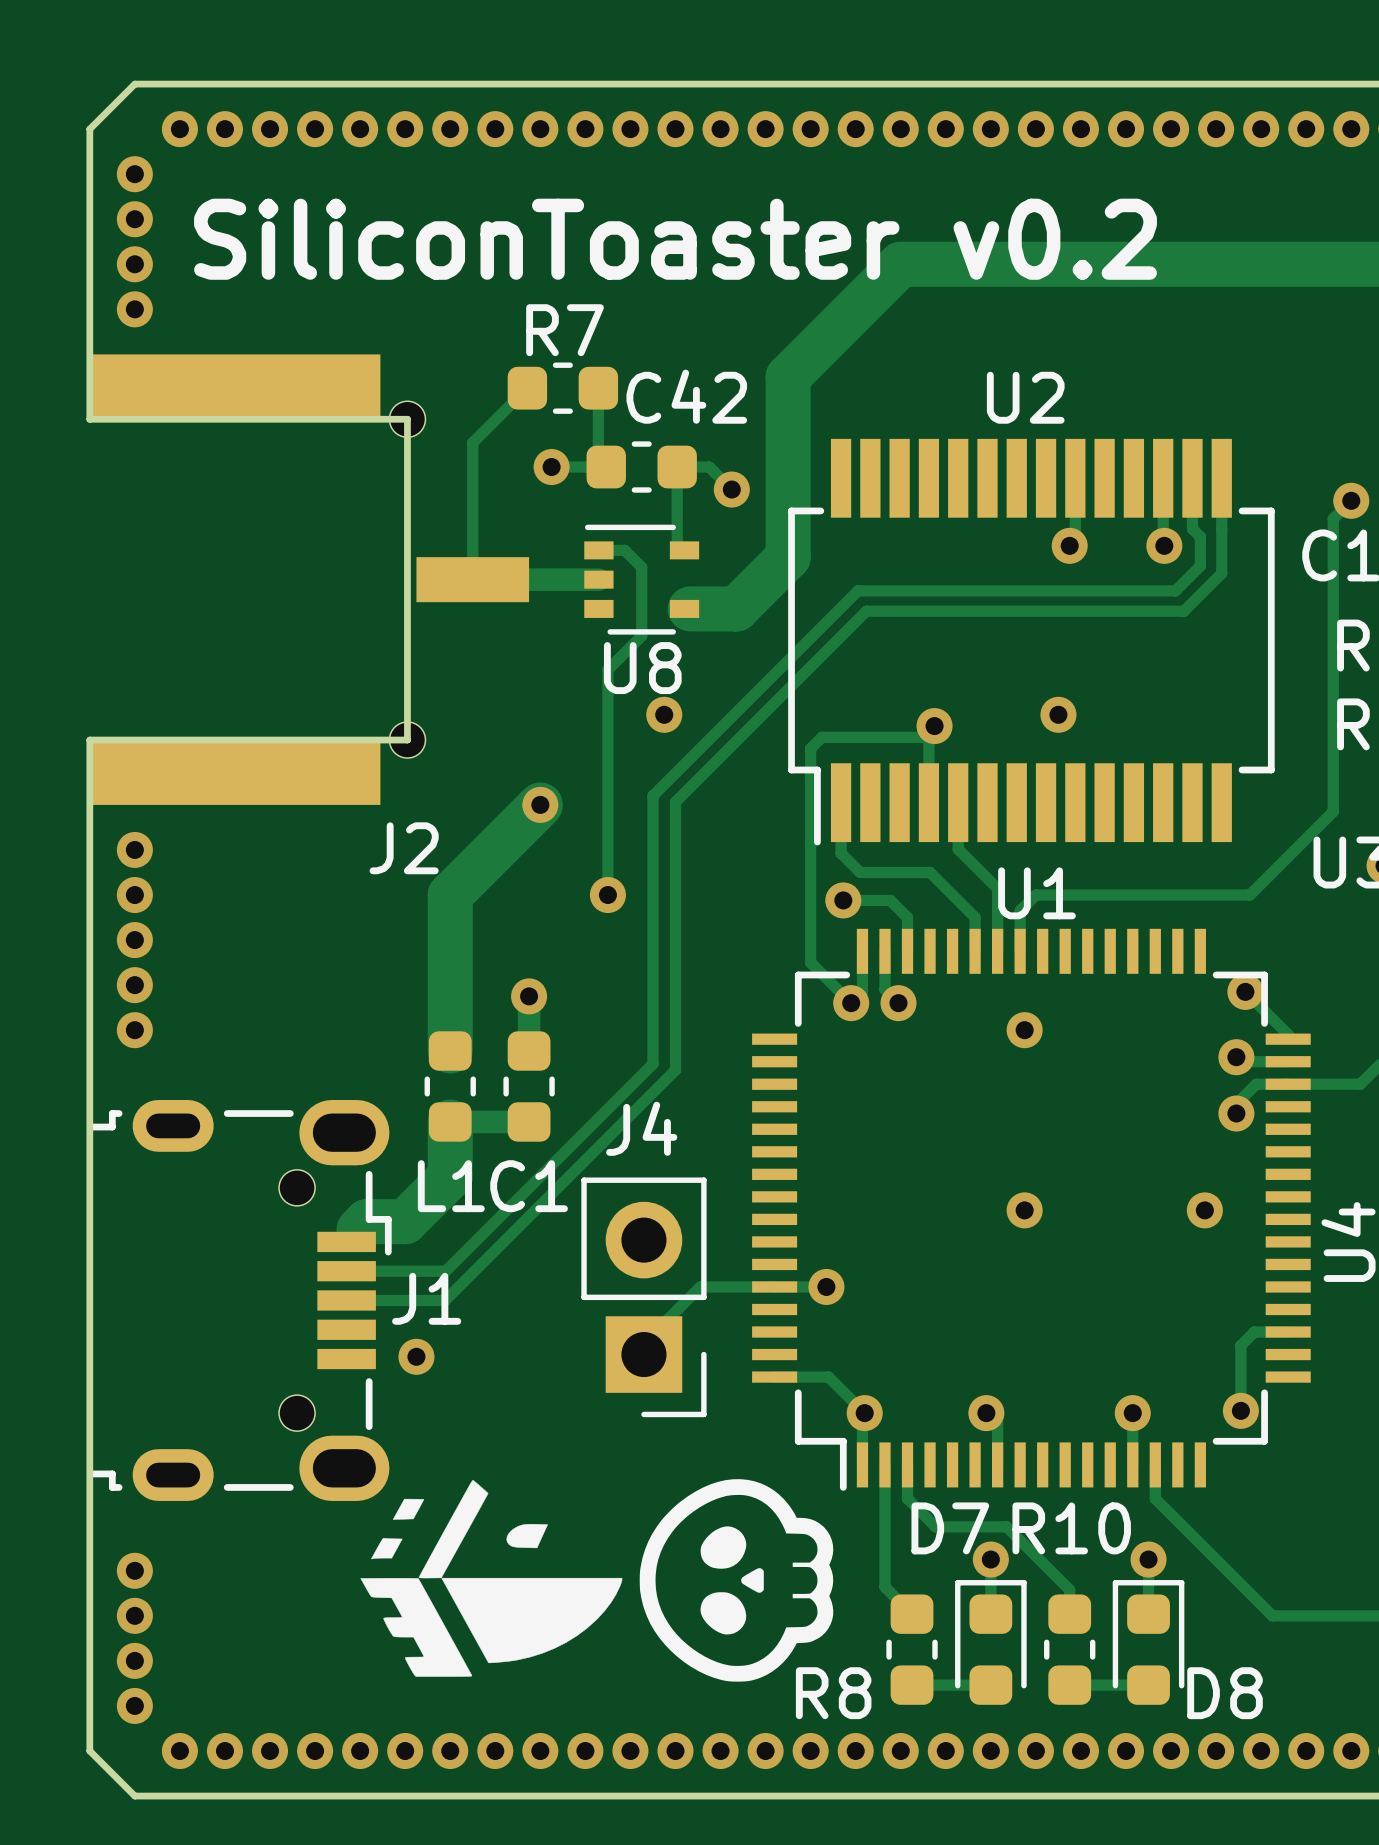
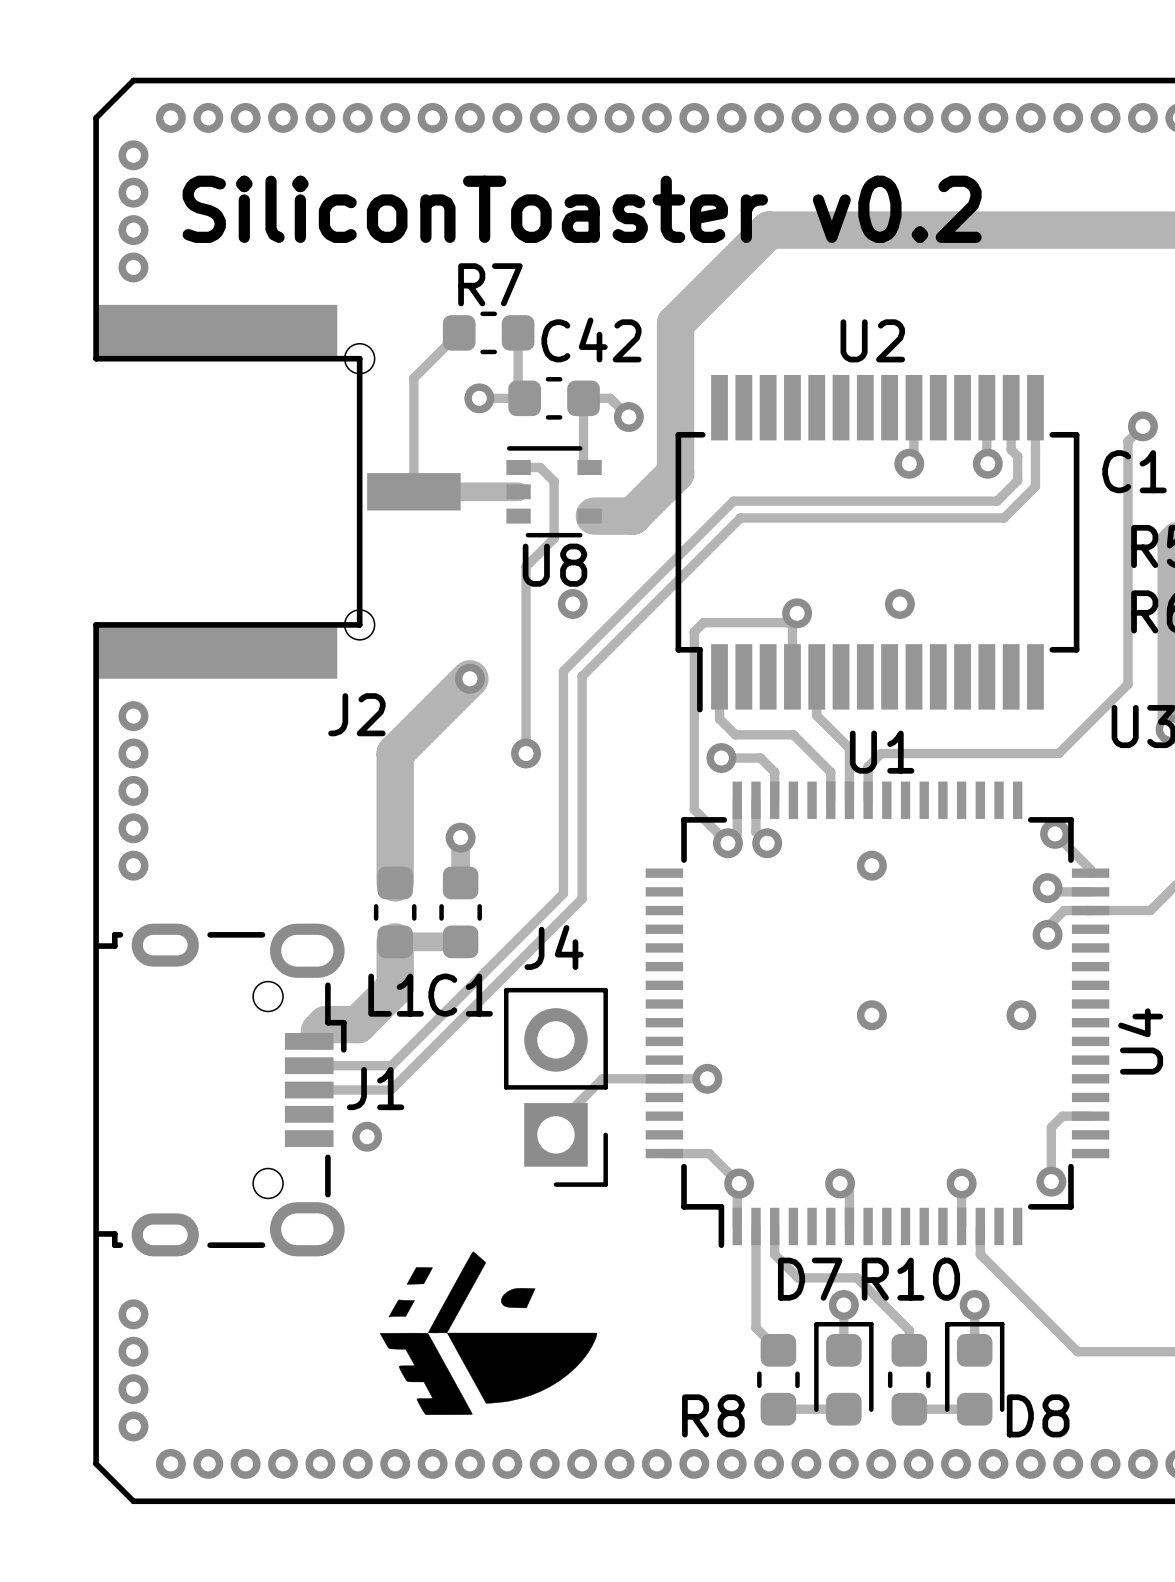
drawing: [639, 1479, 834, 1682] -> none
drawing position: (491, 1578) -> (488, 1333)

